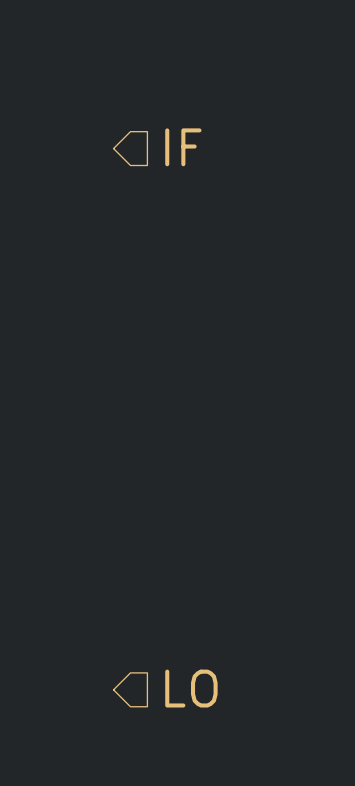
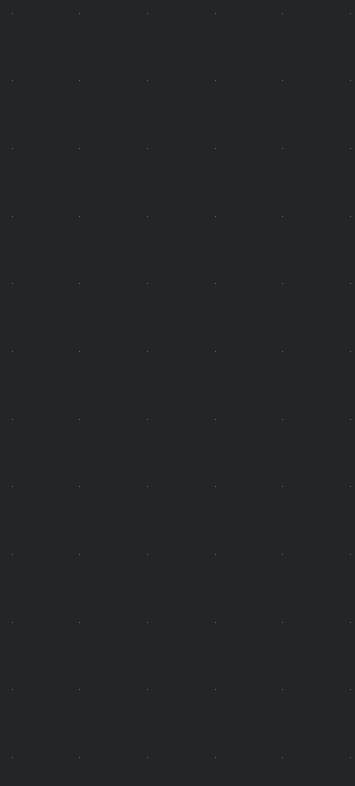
hierarchical label: IF (183, 147) -> none
hierarchical label: LO (191, 688) -> none

